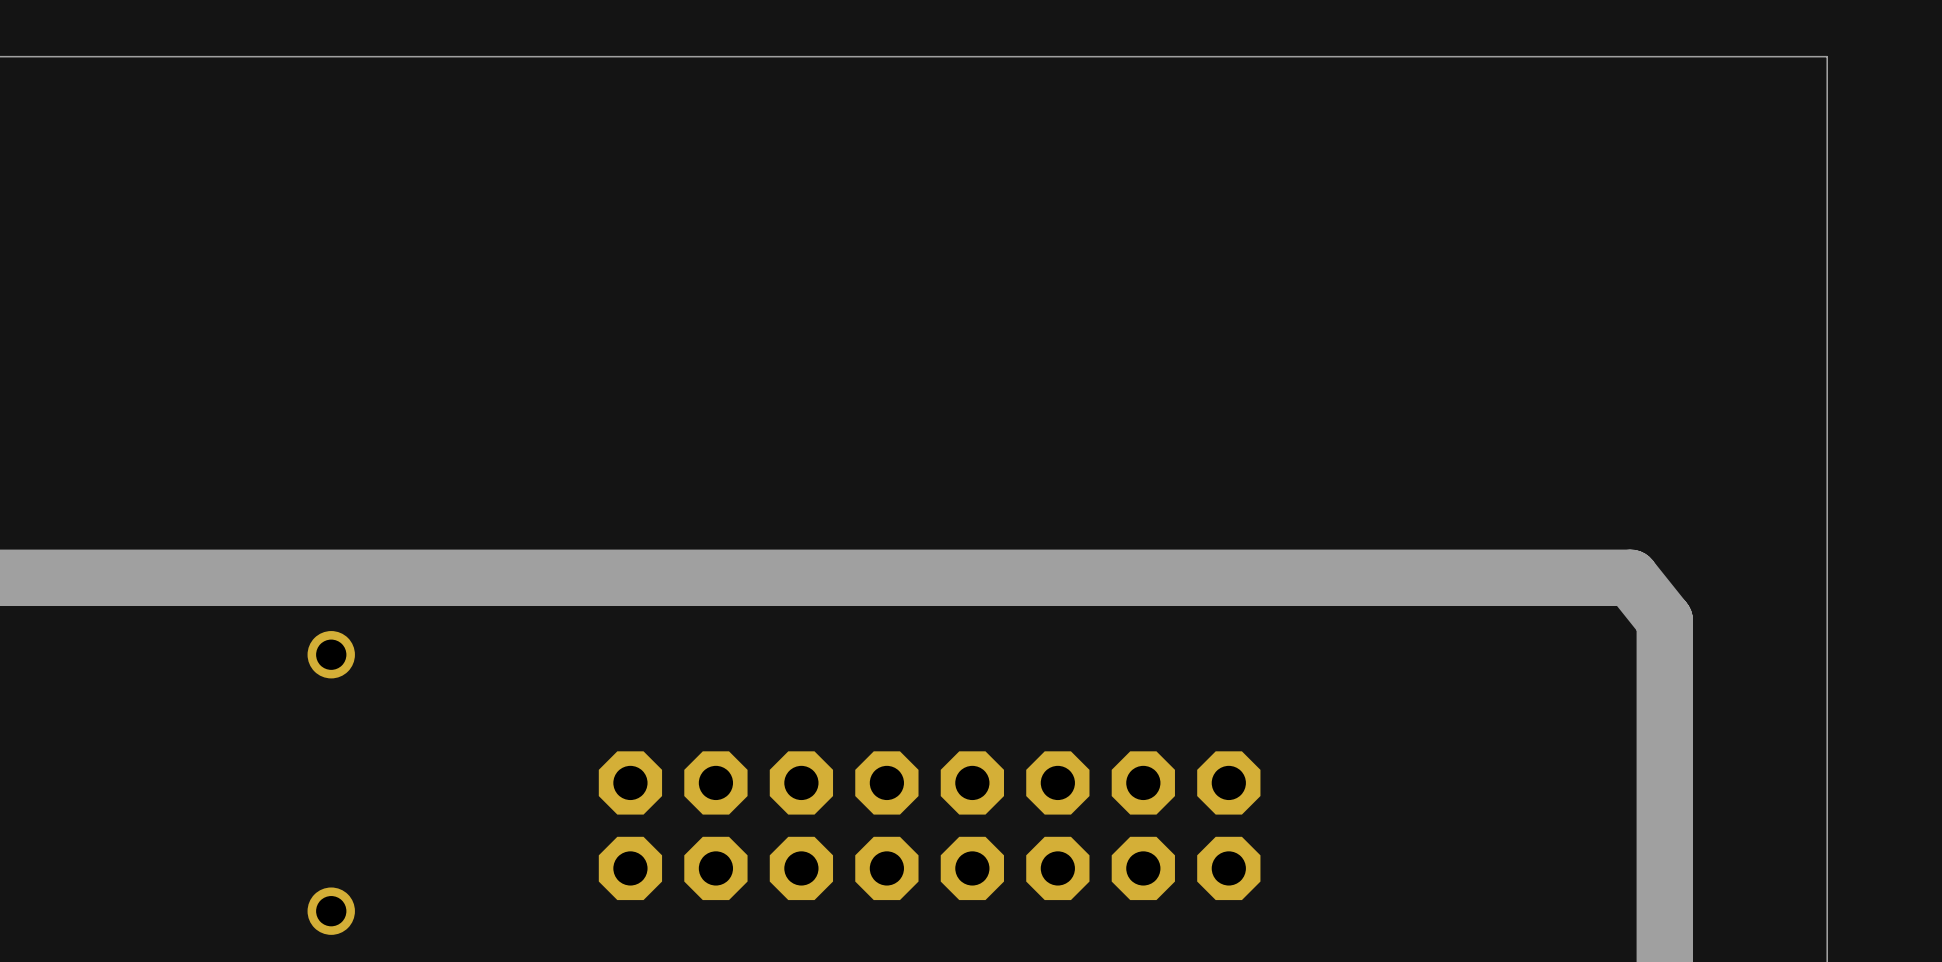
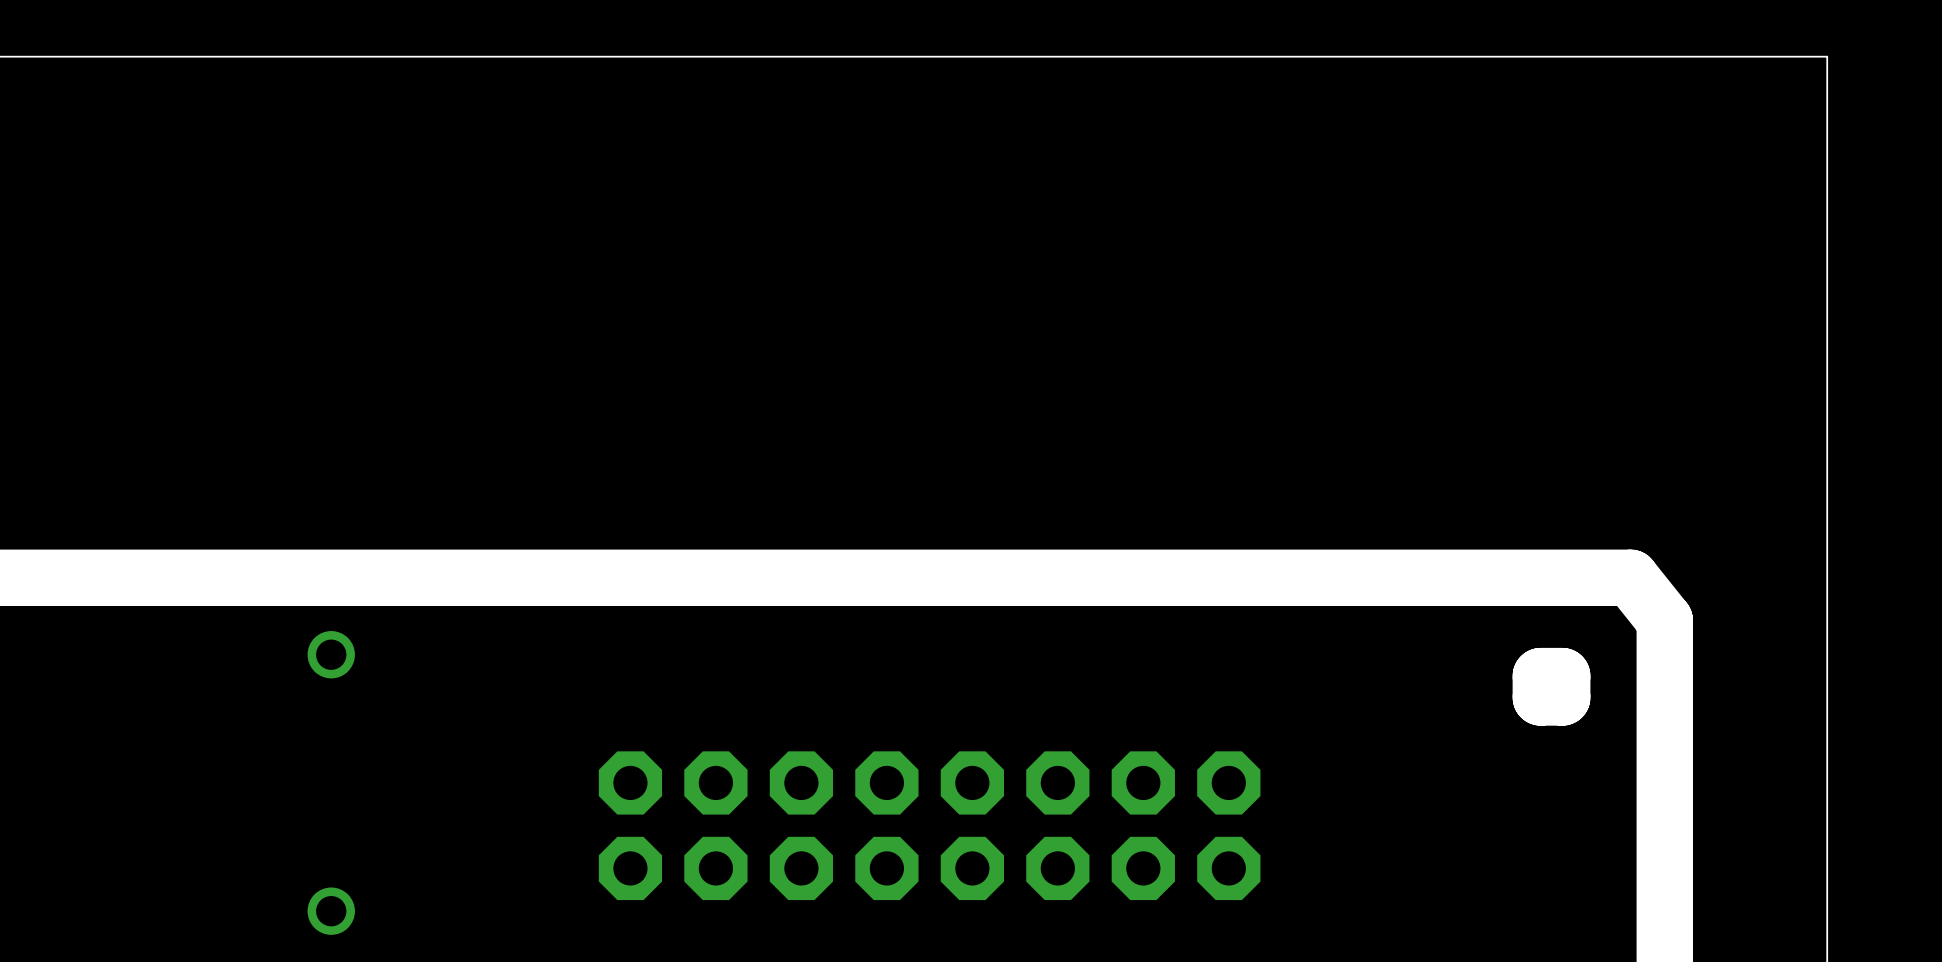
board edge: none -> (1562, 676) (1562, 697) (1540, 697) (1540, 676) (1562, 676)

